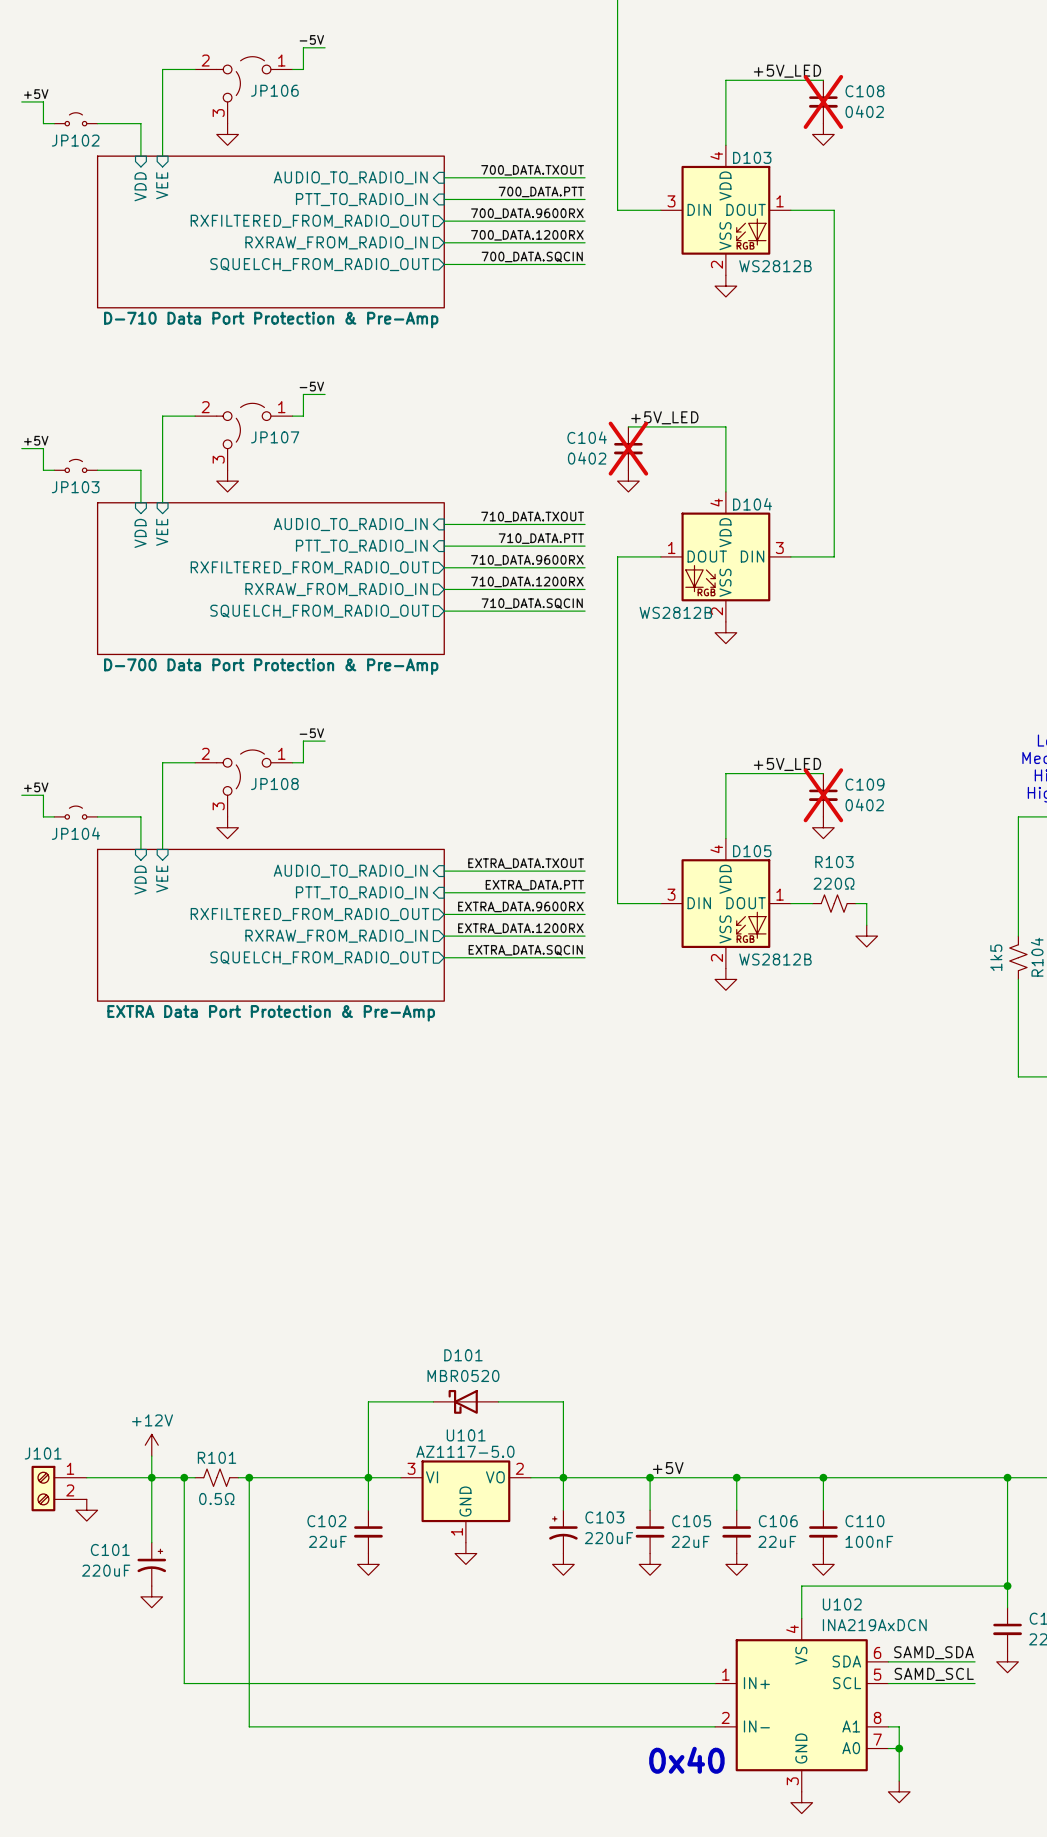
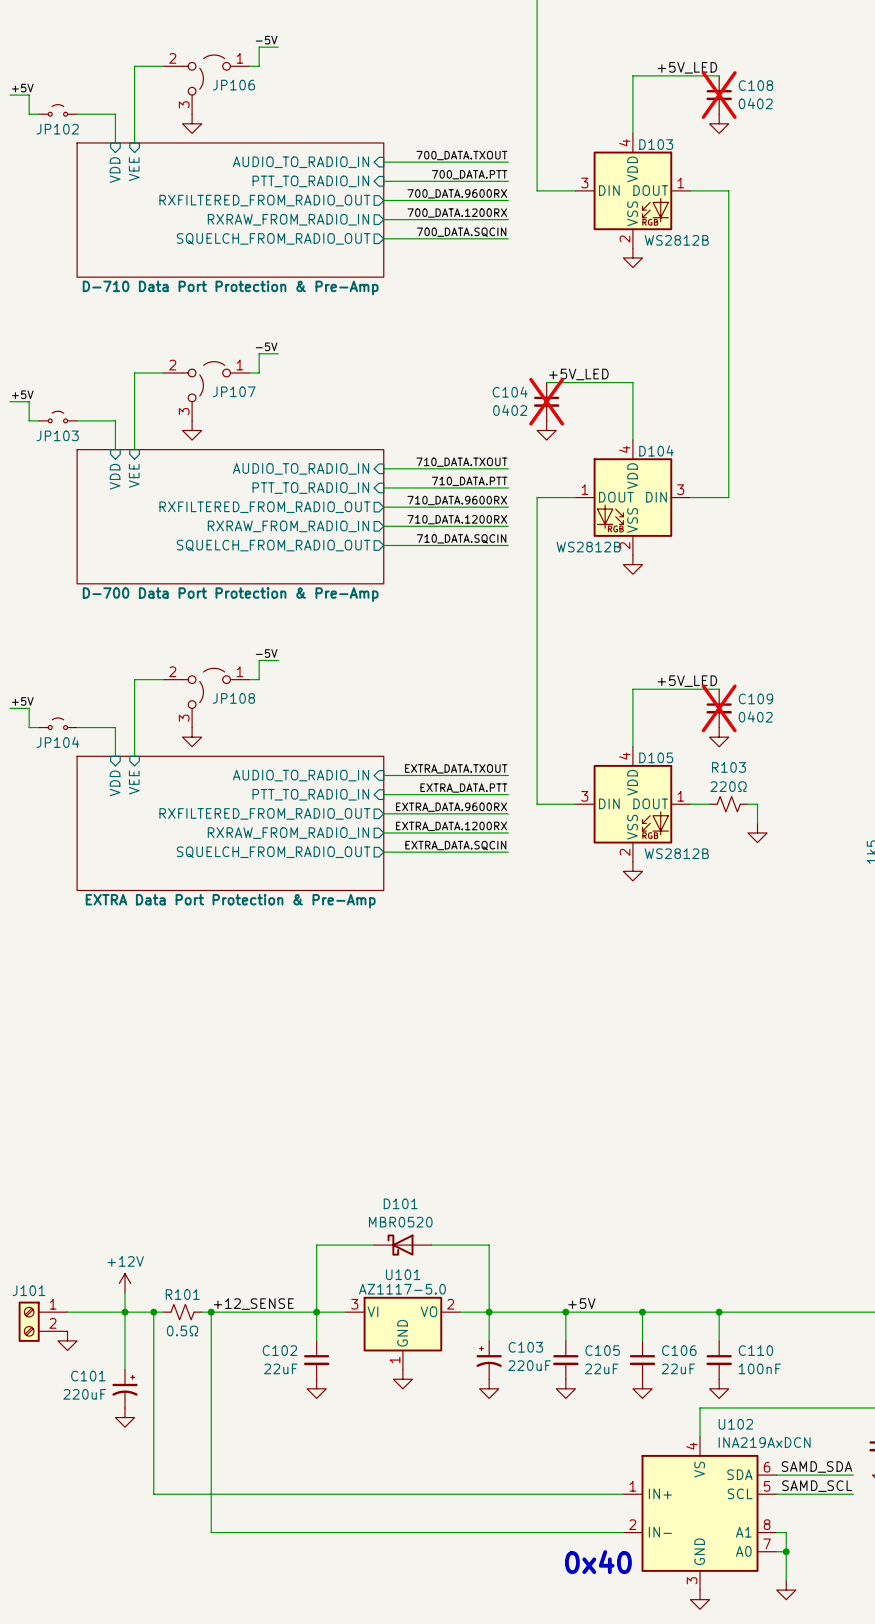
label: none -> +12_SENSE (253, 1304)

